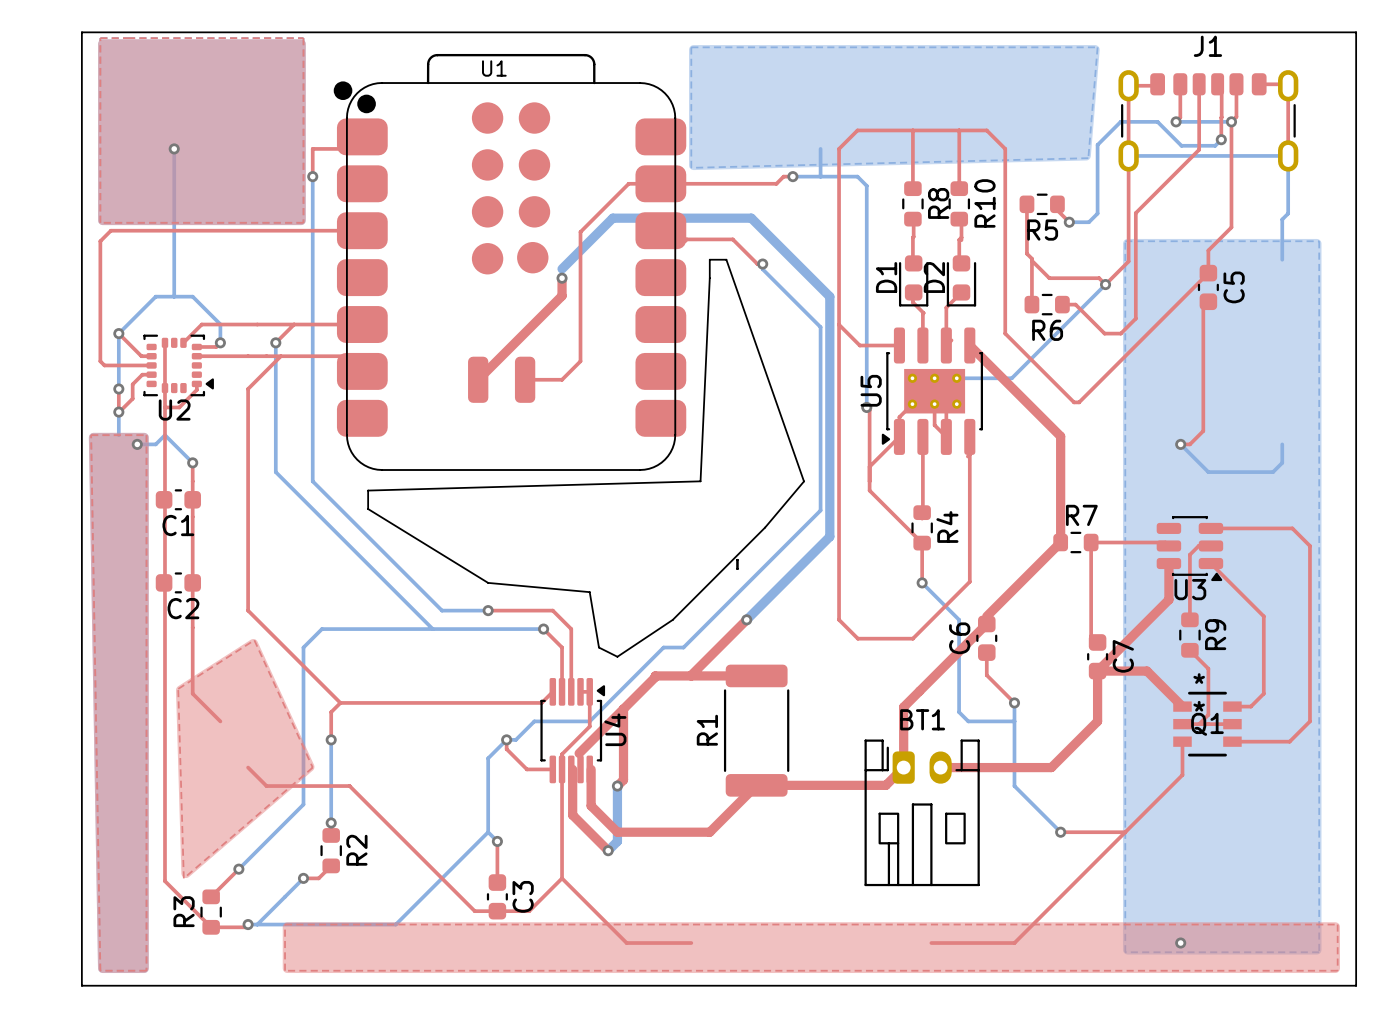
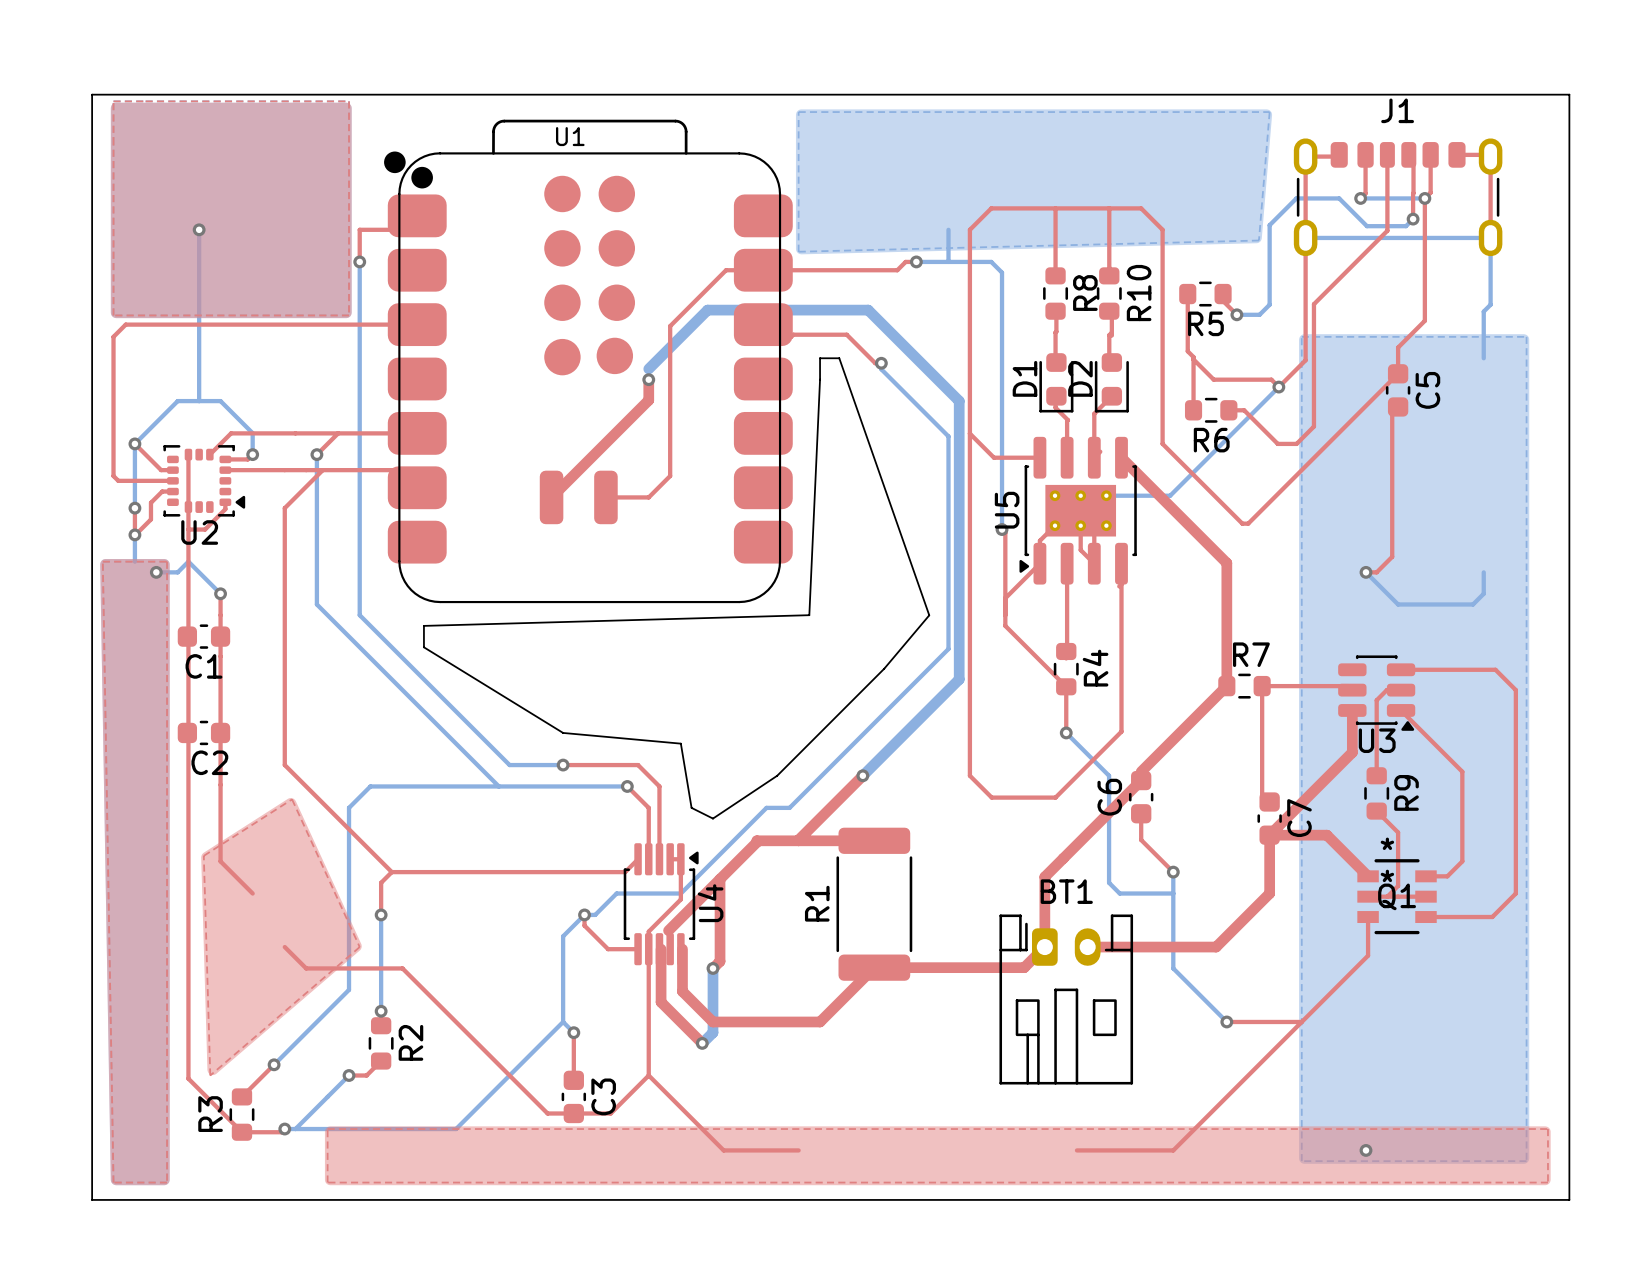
board edge: (737, 559) (737, 559) (737, 569) (737, 569) (737, 559) -> none

